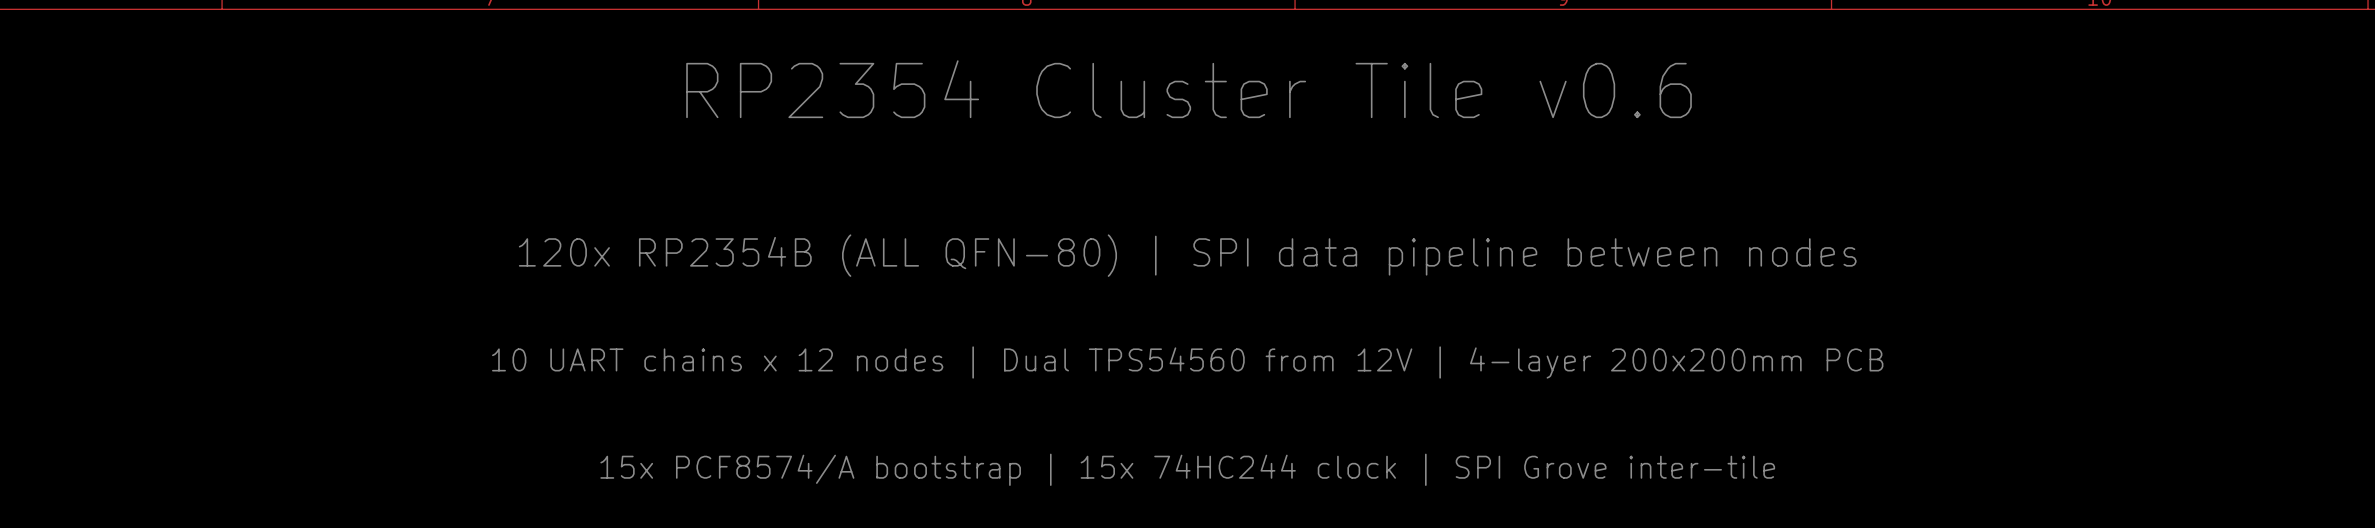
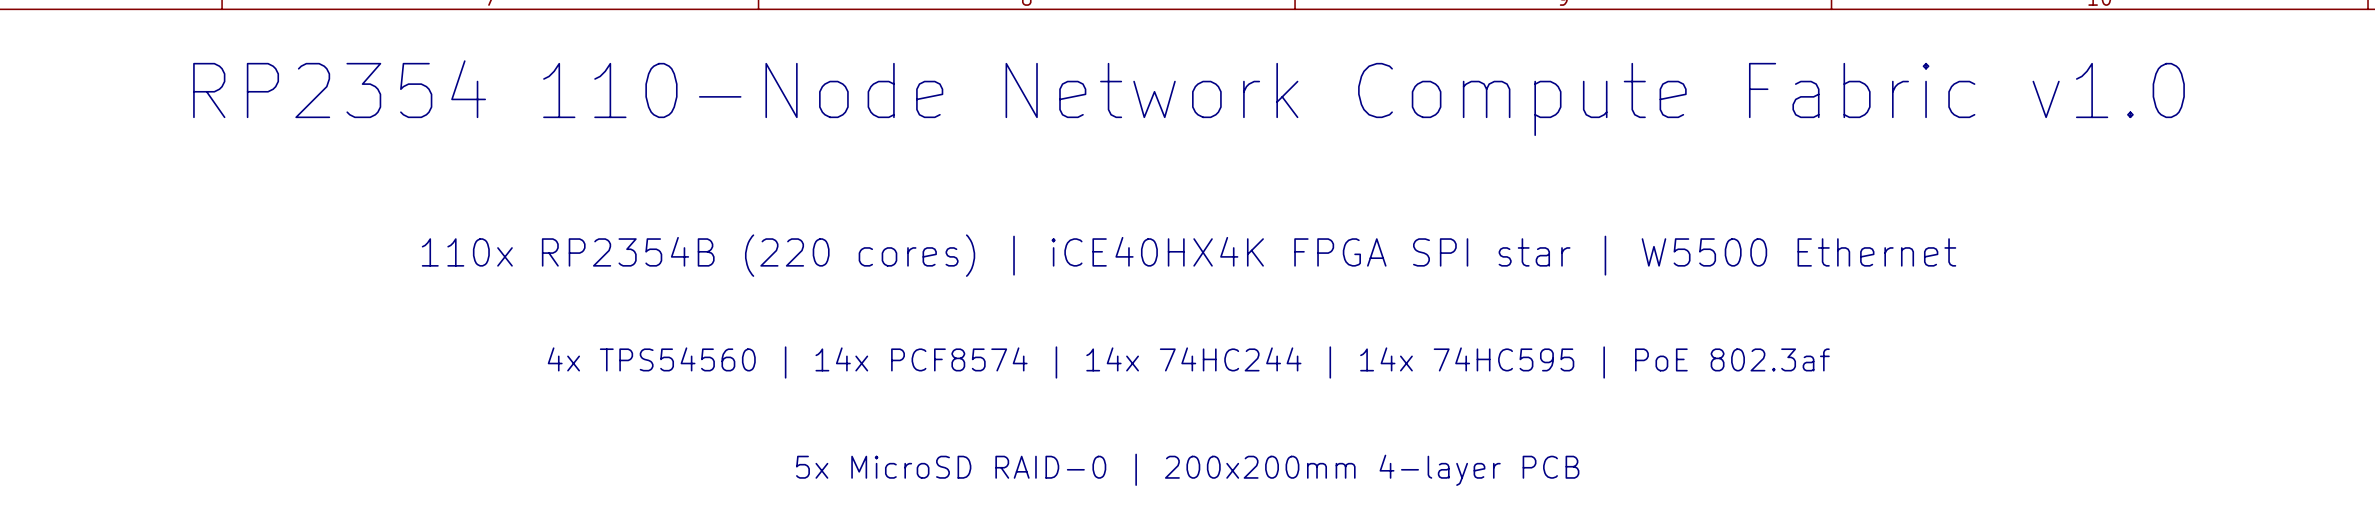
text: RP2354 Cluster Tile v0.6 (1189, 89) -> RP2354 110-Node Network Compute Fabric v1.0 (1189, 98)
text: 120x RP2354B (ALL QFN-80) | SPI data pipeline between nodes (1187, 255) -> 110x RP2354B (220 cores) | iCE40HX4K FPGA SPI star | W5500 Ethernet (1189, 255)
text: 10 UART chains x 12 nodes | Dual TPS54560 from 12V | 4-layer 200x200mm PCB (1187, 362) -> 4x TPS54560 | 14x PCF8574 | 14x 74HC244 | 14x 74HC595 | PoE 802.3af (1188, 362)
text: 15x PCF8574/A bootstrap | 15x 74HC244 clock | SPI Grove inter-tile (1187, 469) -> 5x MicroSD RAID-0 | 200x200mm 4-layer PCB (1187, 469)

